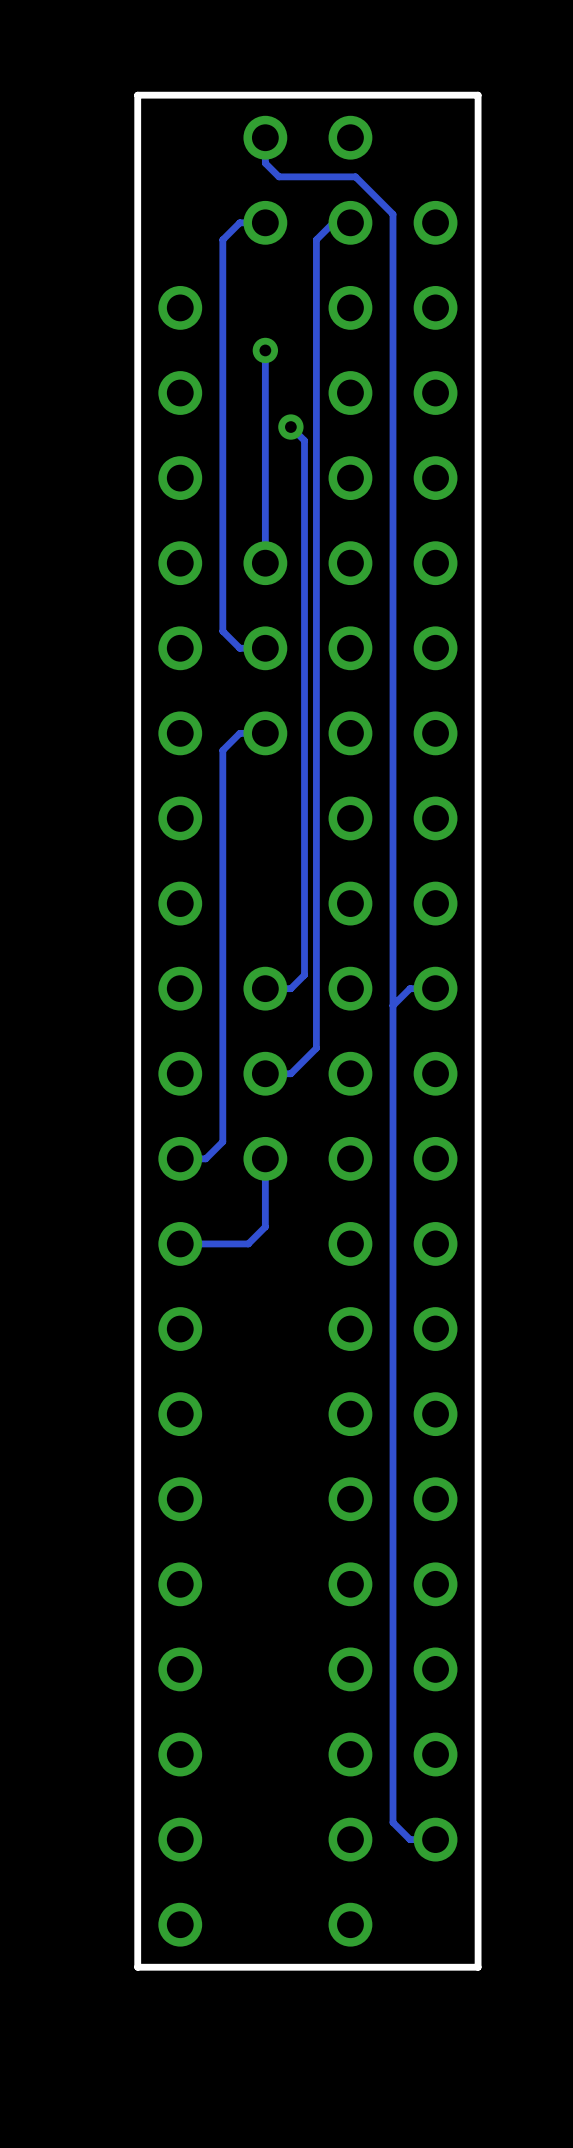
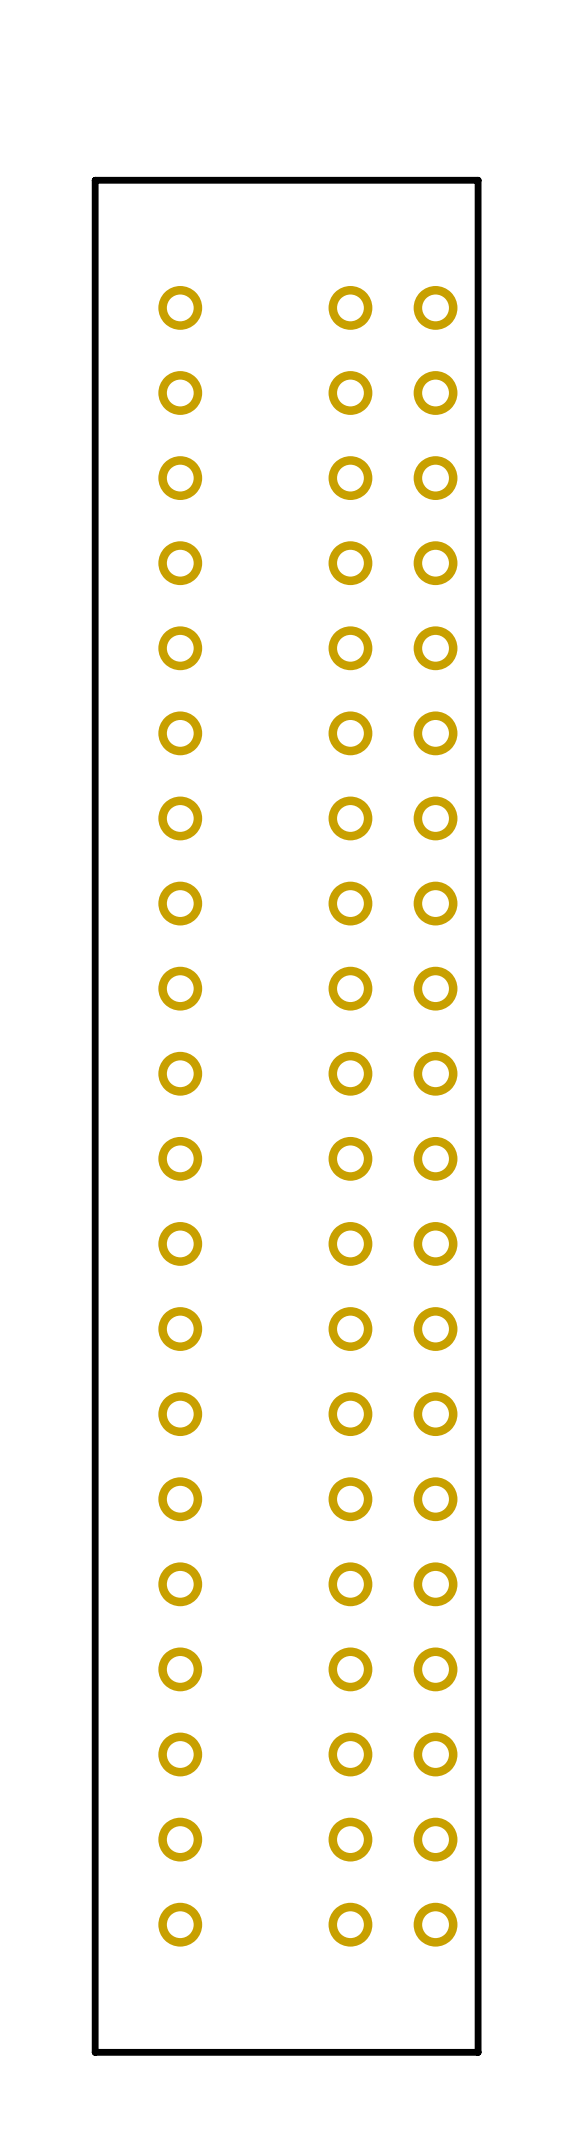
track: (265, 137) (265, 163) (278, 176) (355, 176) (393, 214) (393, 1822) (410, 1839) (435, 1839) -> none
part: (307, 180) -> none
board edge: (478, 180) (478, 95) (137, 95) (137, 1967) (478, 1967) -> (478, 180) (95, 180) (95, 2052) (478, 2052) (478, 1967)
track: (265, 222) (239, 222) (222, 239) (222, 631) (239, 648) (265, 648) -> none
track: (350, 222) (333, 222) (316, 239) (316, 1048) (290, 1073) (265, 1073) -> none
track: (265, 350) (265, 563) -> none
via: (265, 350) -> none
track: (290, 427) (304, 440) (304, 975) (290, 988) (265, 988) -> none
via: (290, 427) -> none
part: (265, 648) -> none
track: (265, 733) (239, 733) (222, 750) (222, 1141) (205, 1158) (180, 1158) -> none
track: (435, 988) (410, 988) (393, 1005) -> none
part position: (435, 1031) -> (435, 1116)
part: (265, 1073) -> none
track: (265, 1158) (265, 1226) (248, 1243) (180, 1243) -> none

